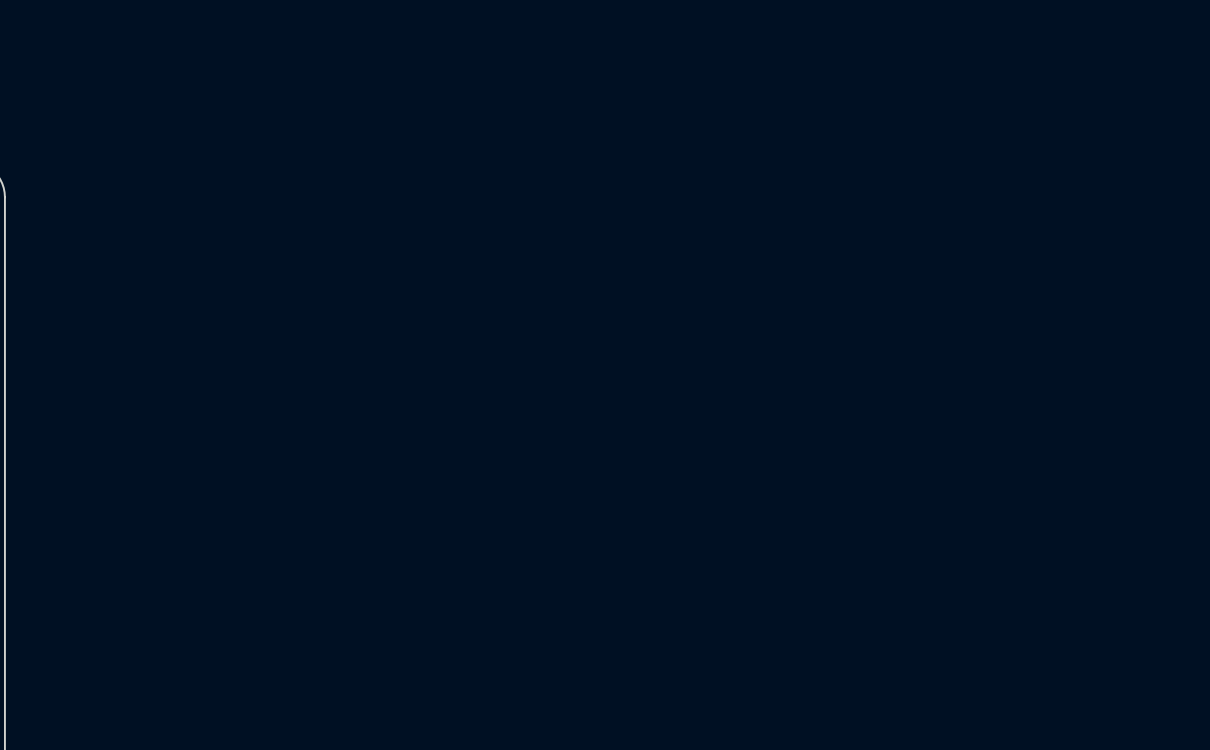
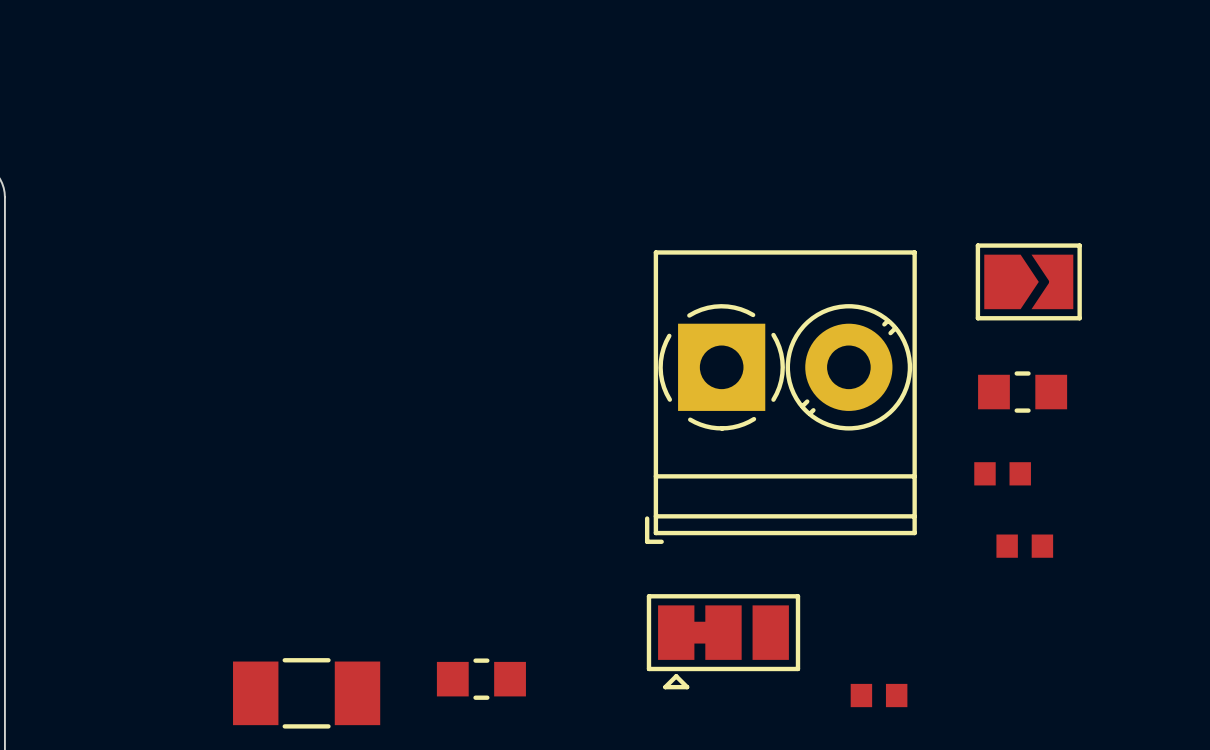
part: none -> (1028, 281)
part: none -> (1022, 392)
part: none -> (780, 397)
part: none -> (1002, 473)
part: none -> (1024, 546)
part: none -> (723, 641)
part: none -> (481, 679)
part: none -> (306, 693)
part: none -> (879, 695)

